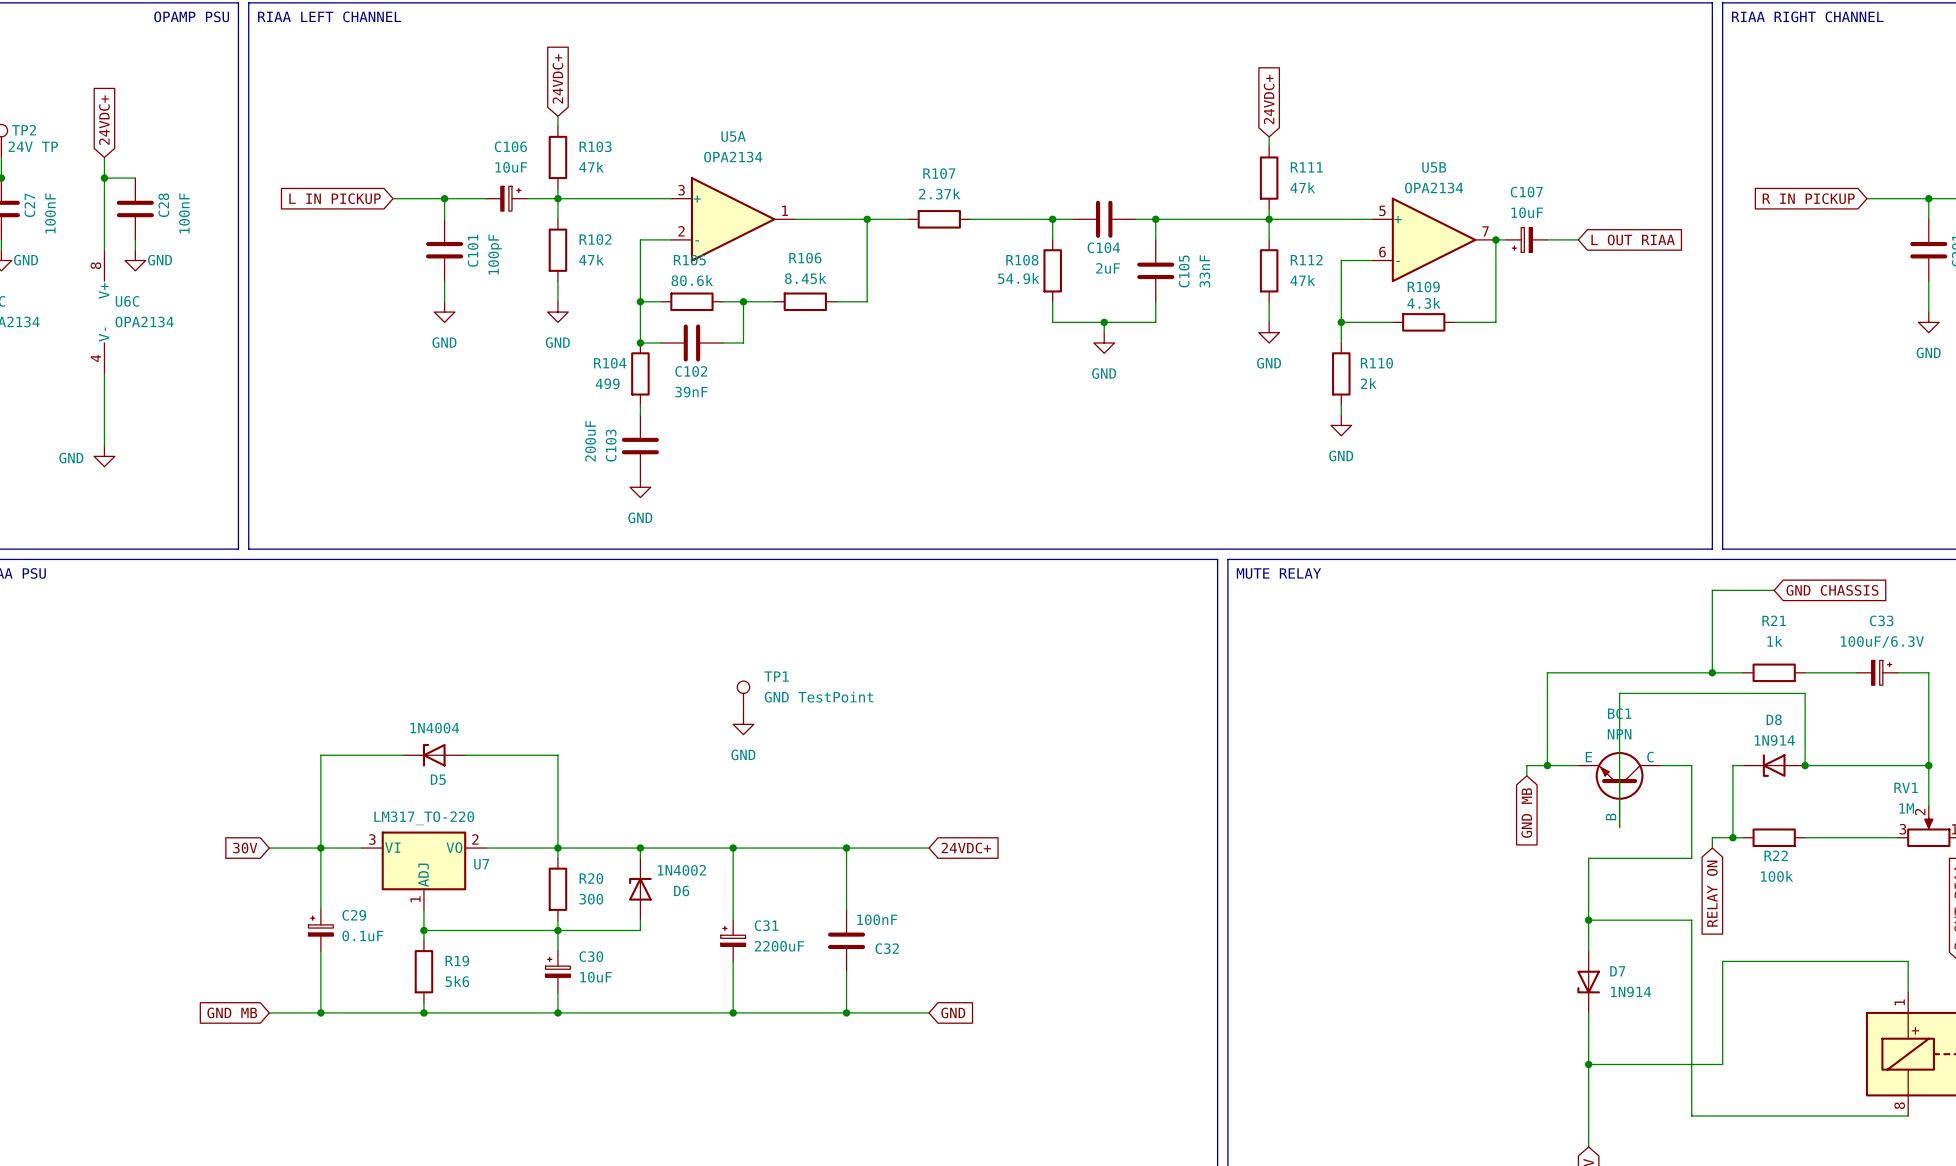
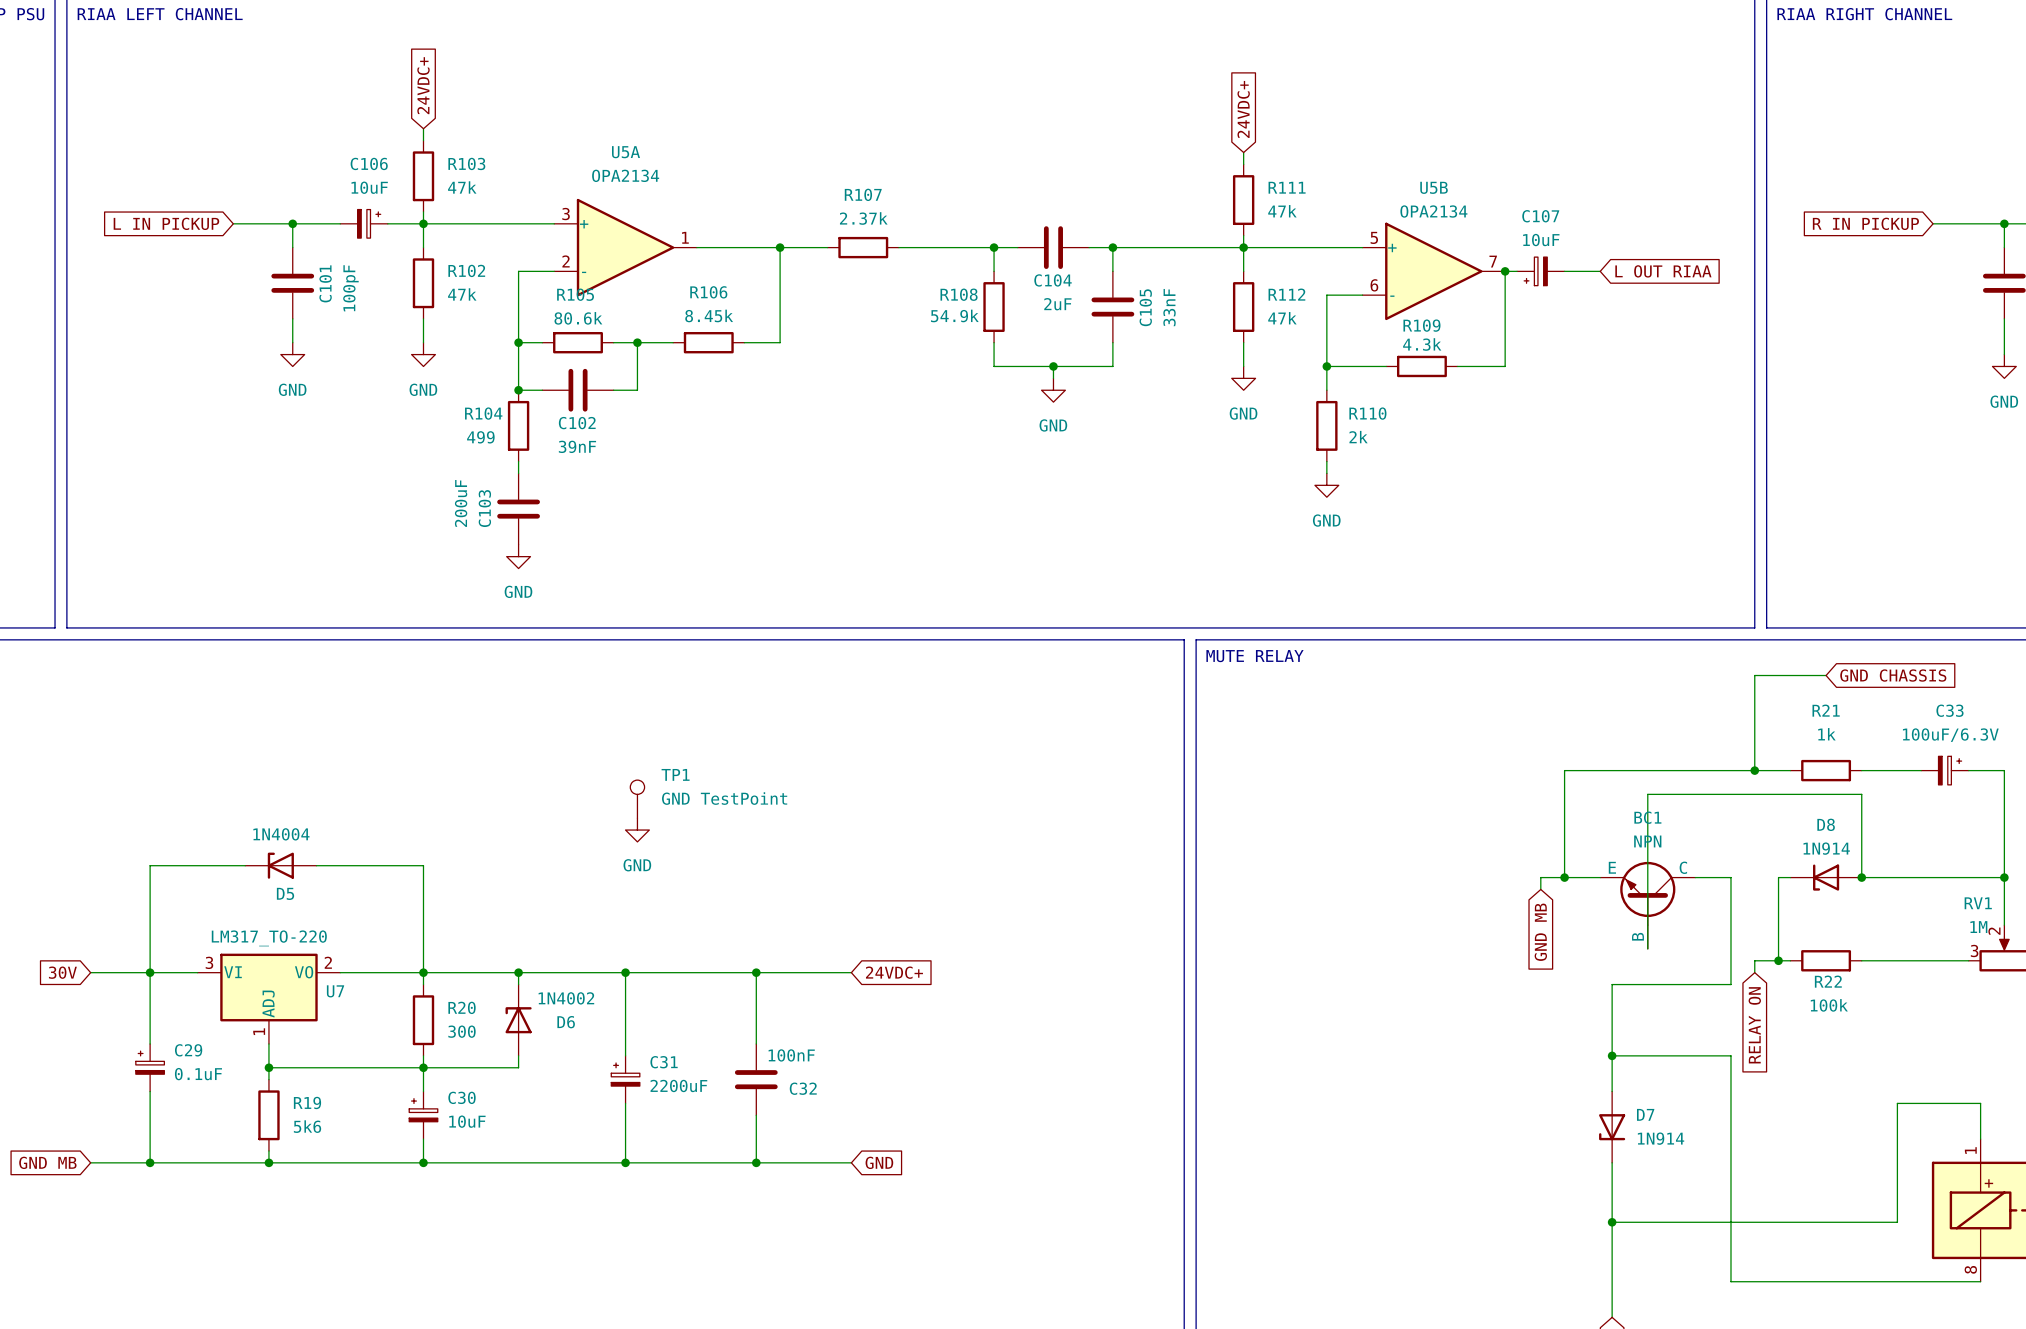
wire: (1836, 961) (1722, 961) (1722, 1064) -> (1897, 1103) (1897, 1222) (1766, 1222)

